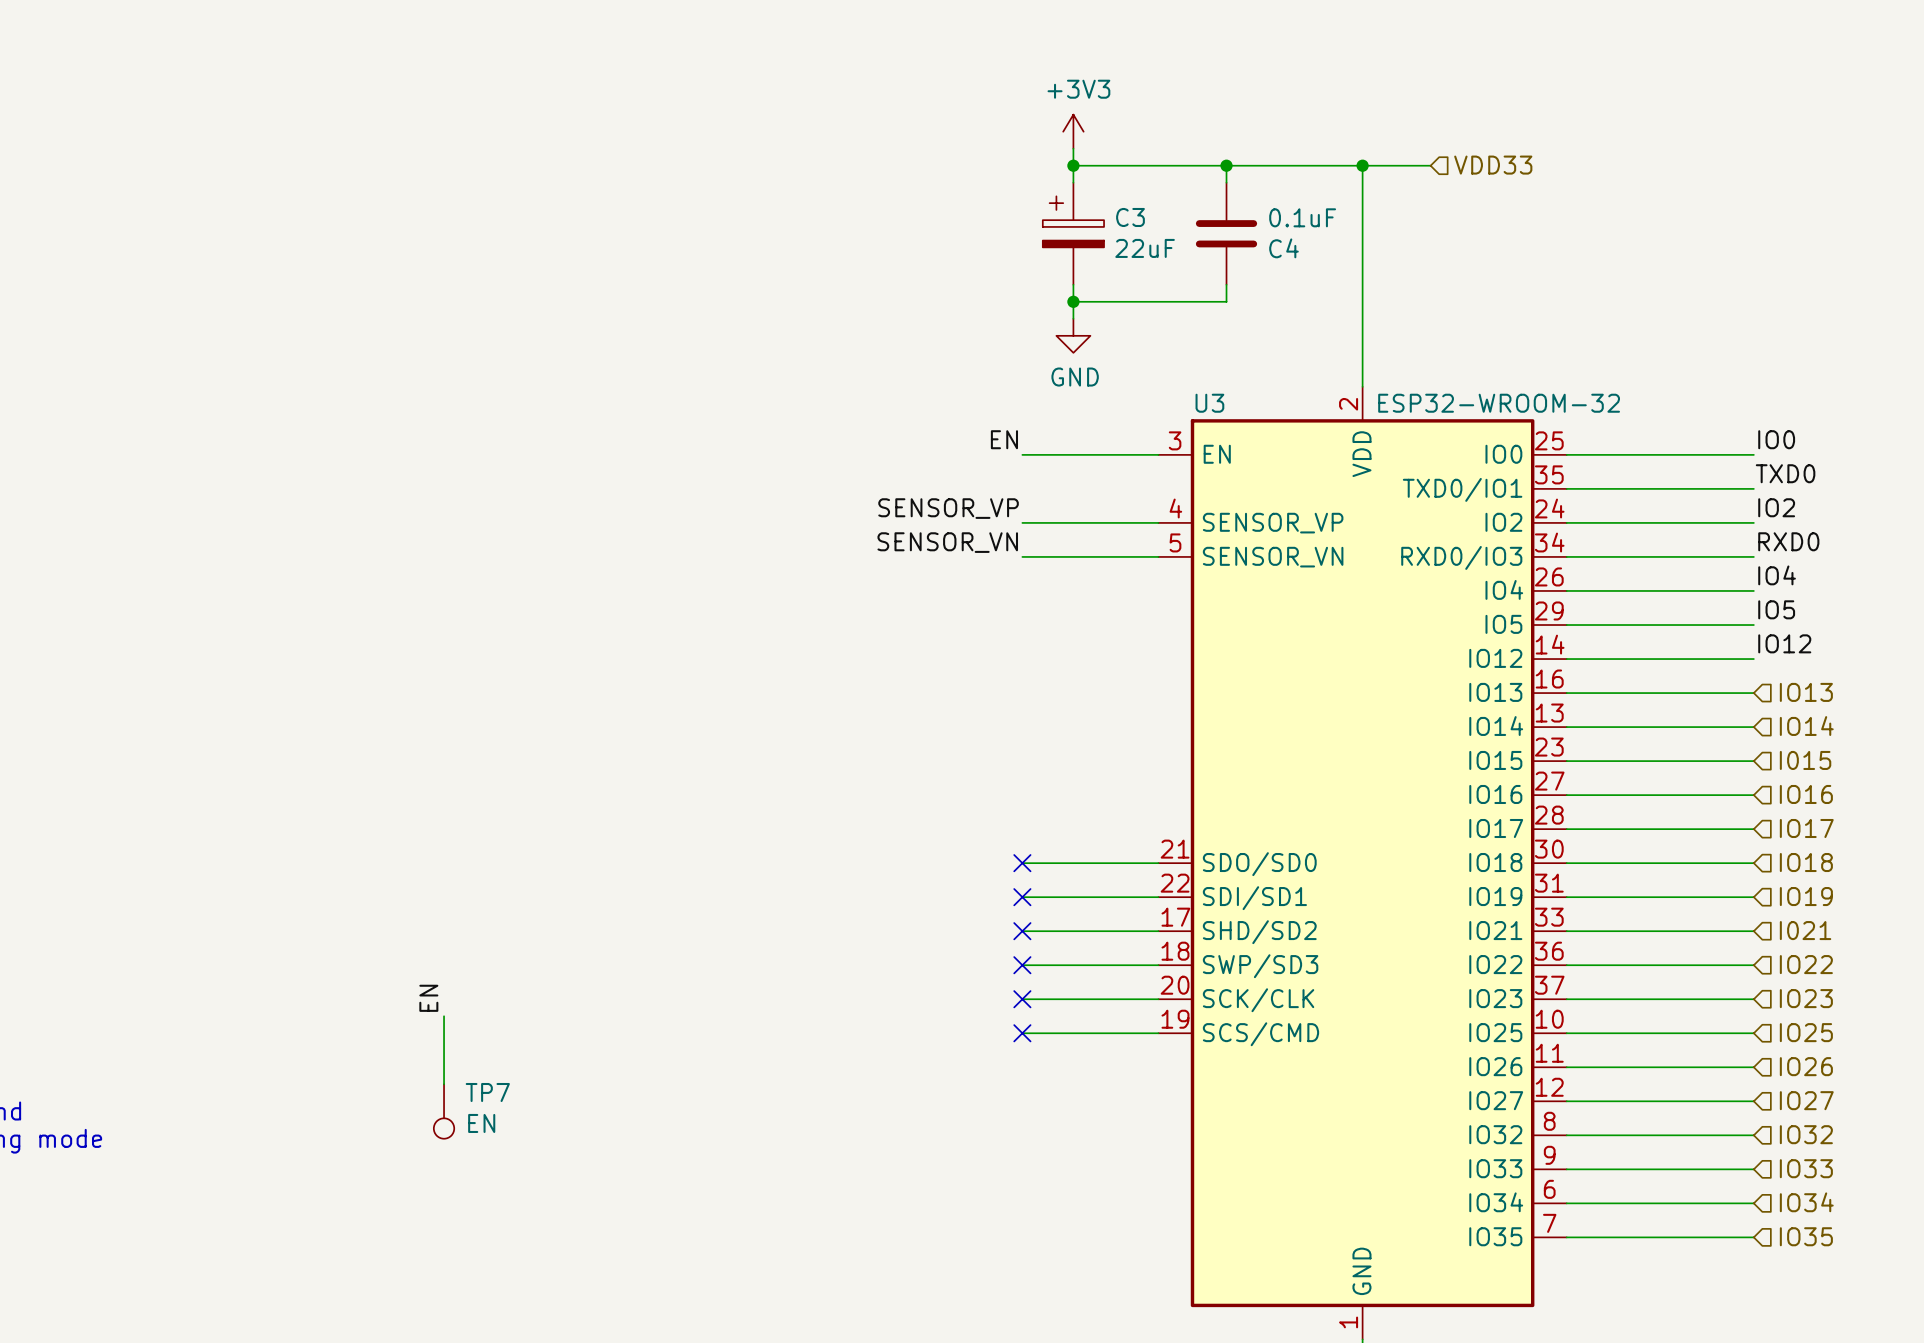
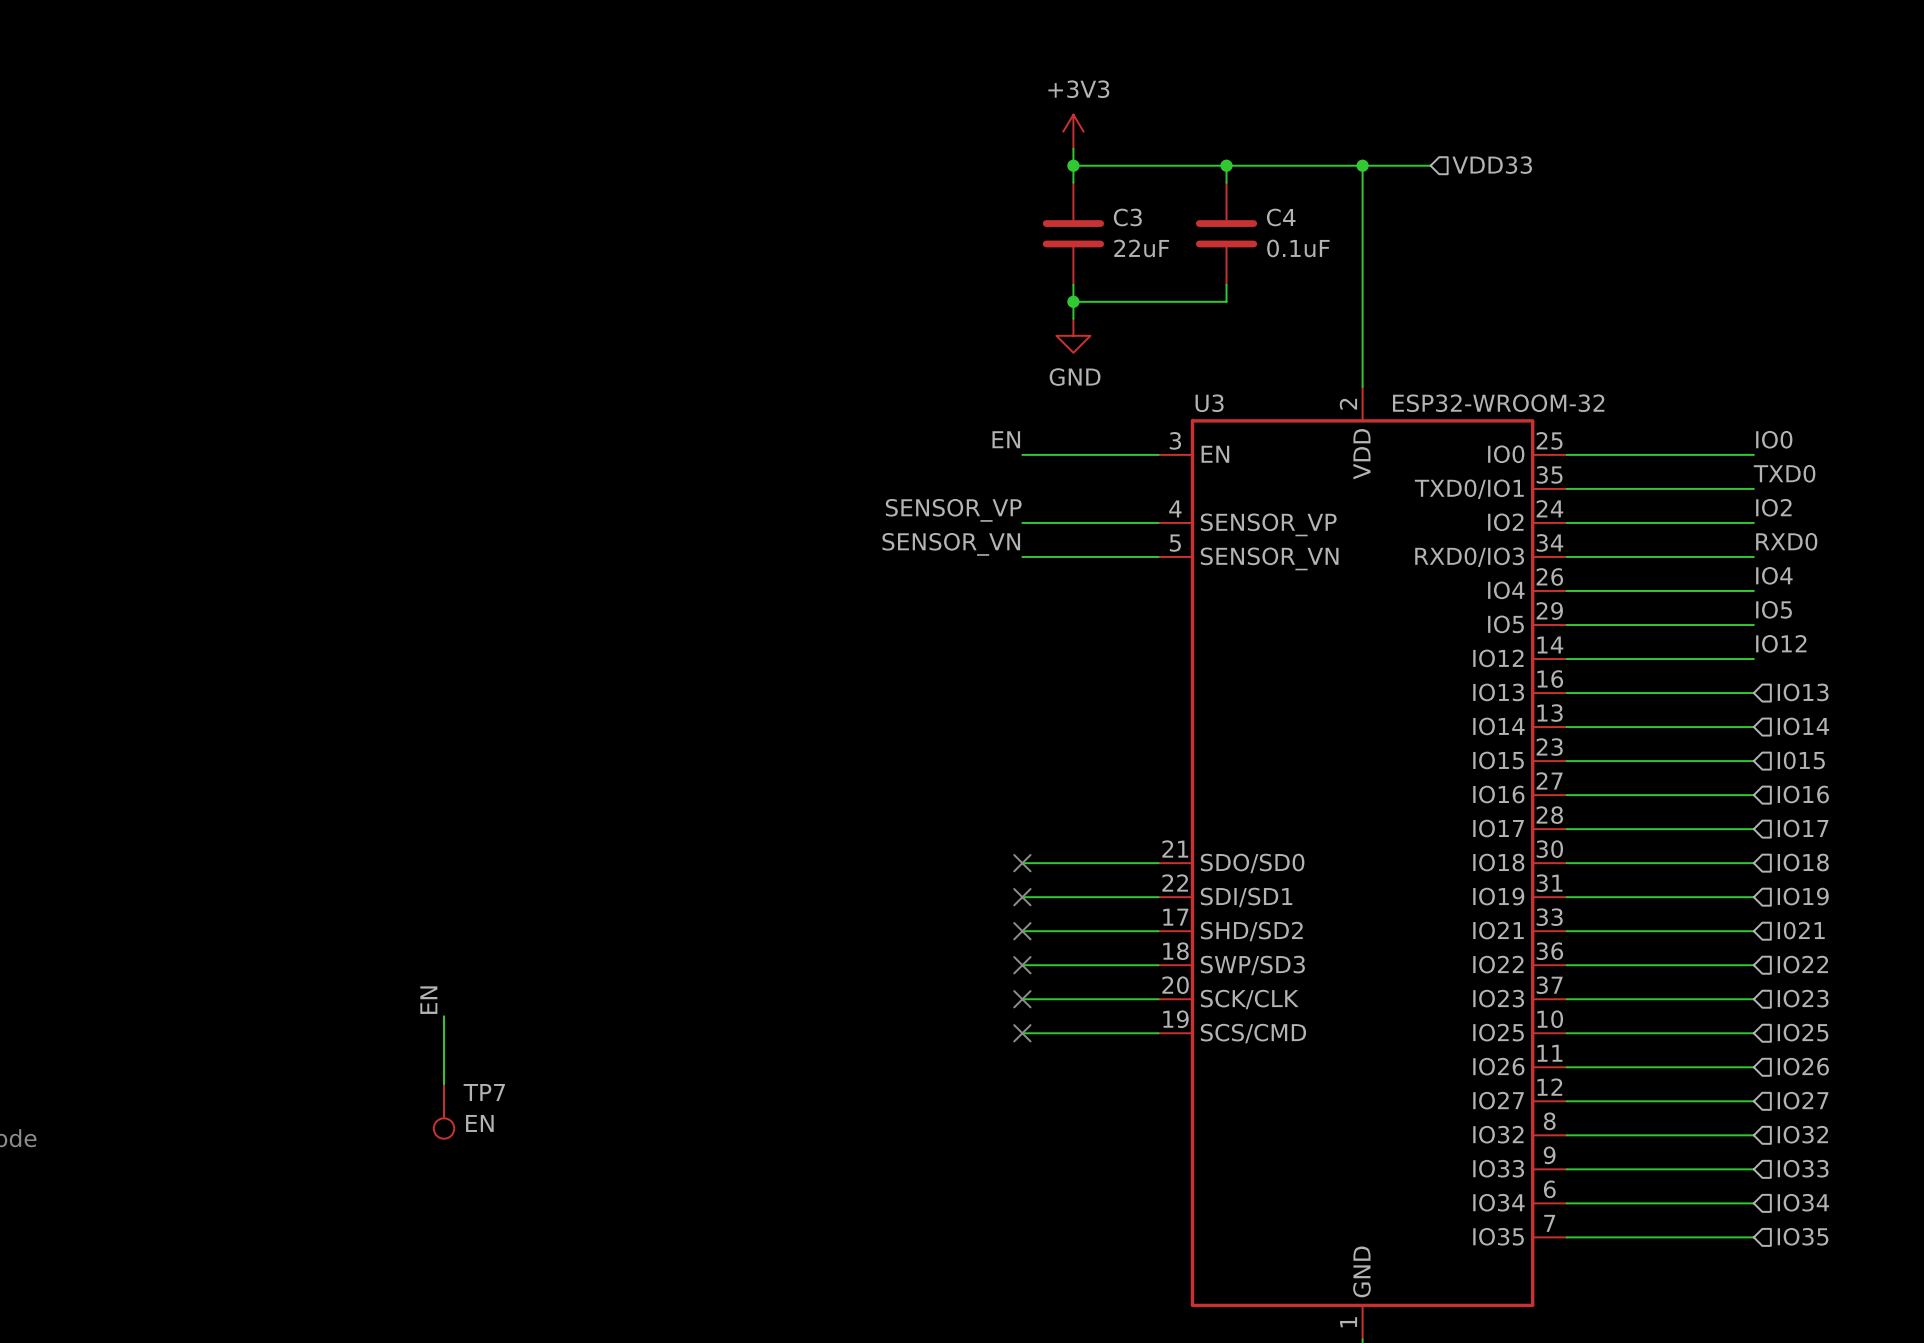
C3 symbol: [1042, 182, 1105, 285] -> [1042, 182, 1105, 285]
C4 value position: 0.1uF (1302, 217) -> 0.1uF (1298, 248)
C4 name position: C4 (1283, 248) -> C4 (1281, 217)

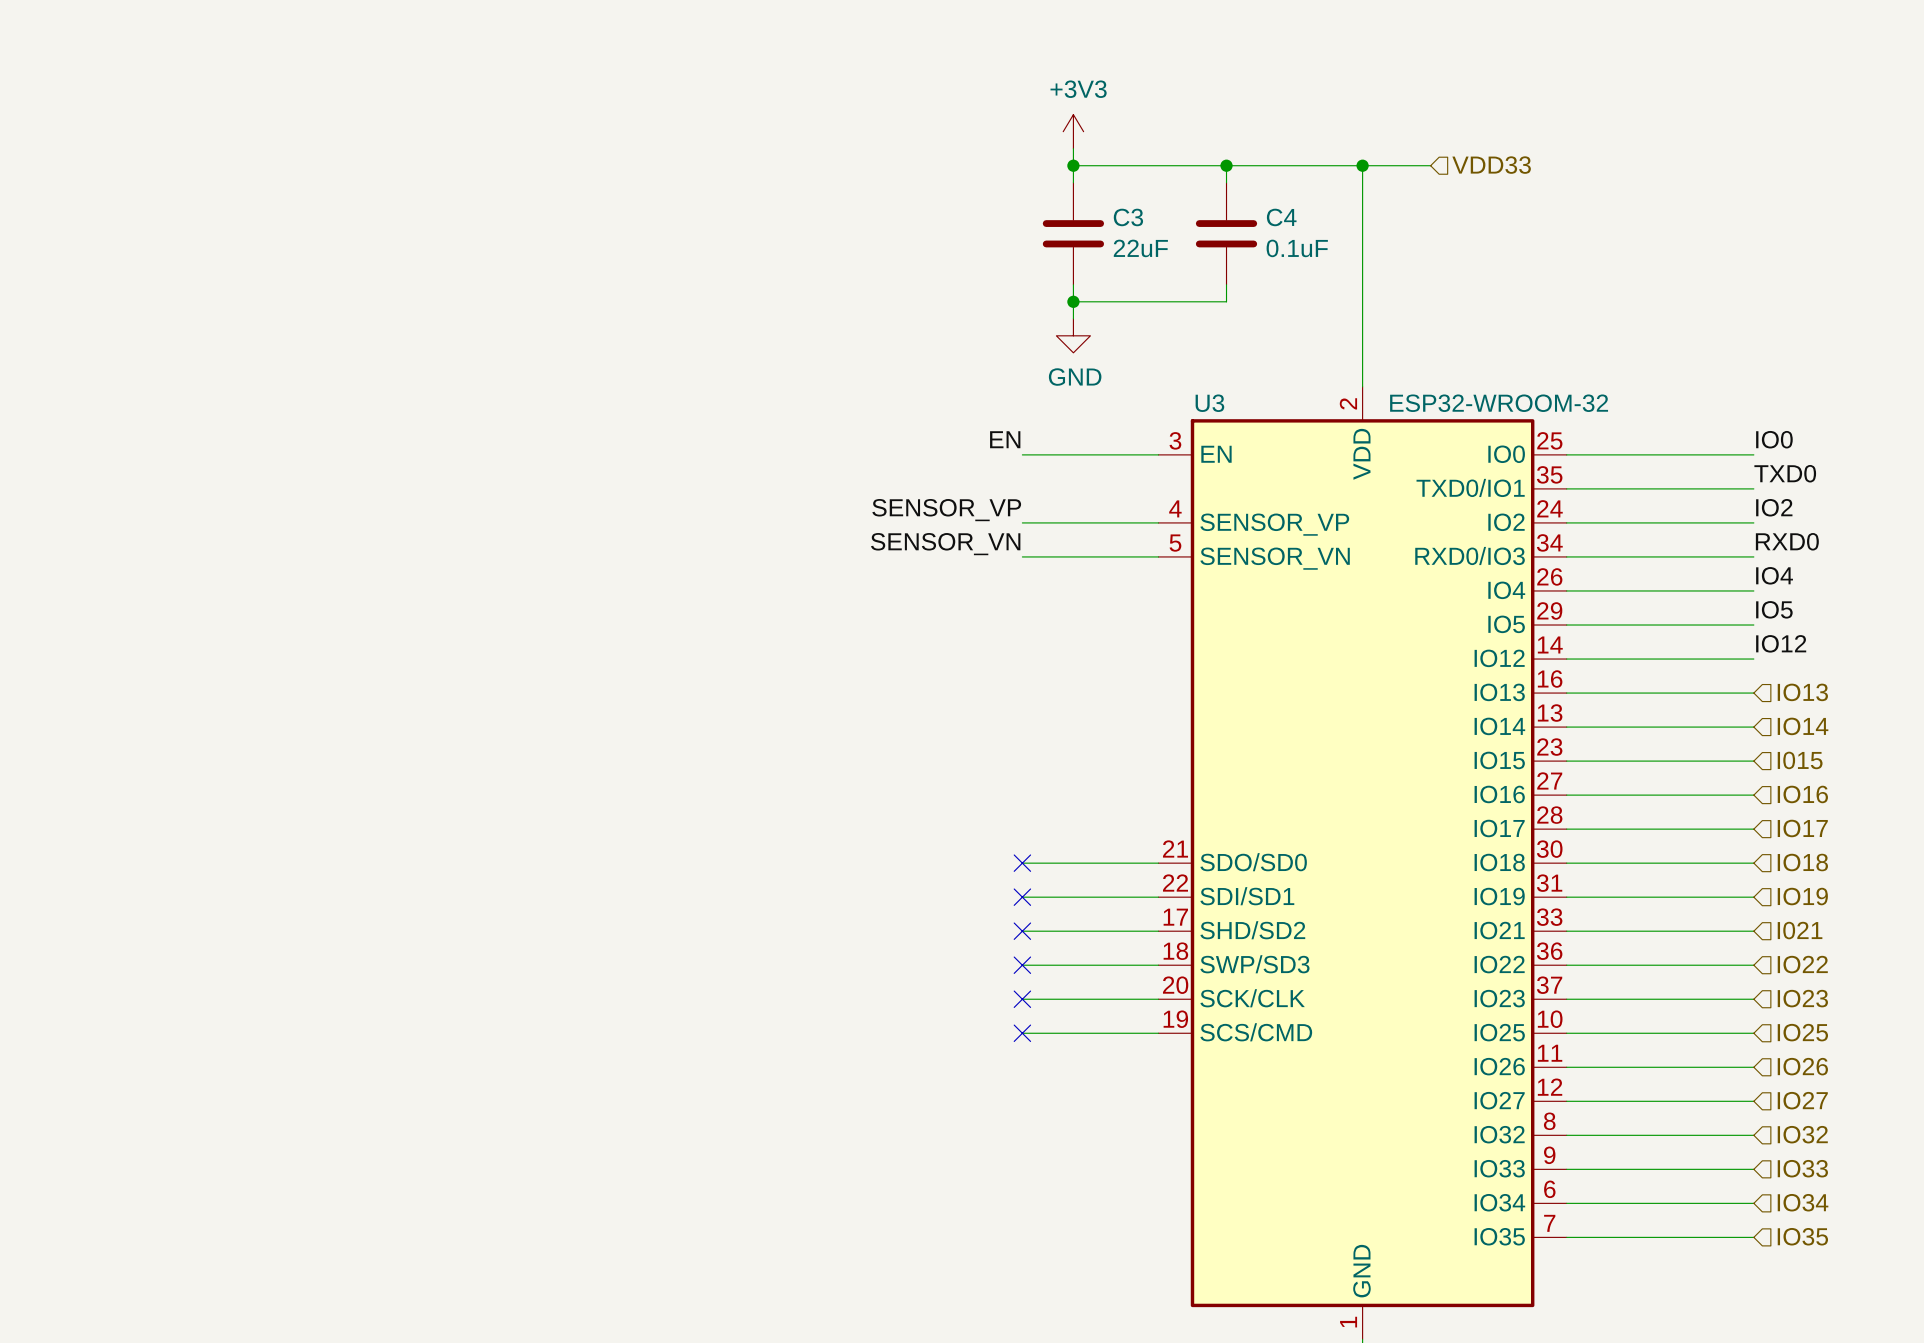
label: EN (428, 1000) -> none
wire: (444, 1016) (444, 1084) -> none
TP7: EN (444, 1111) -> none

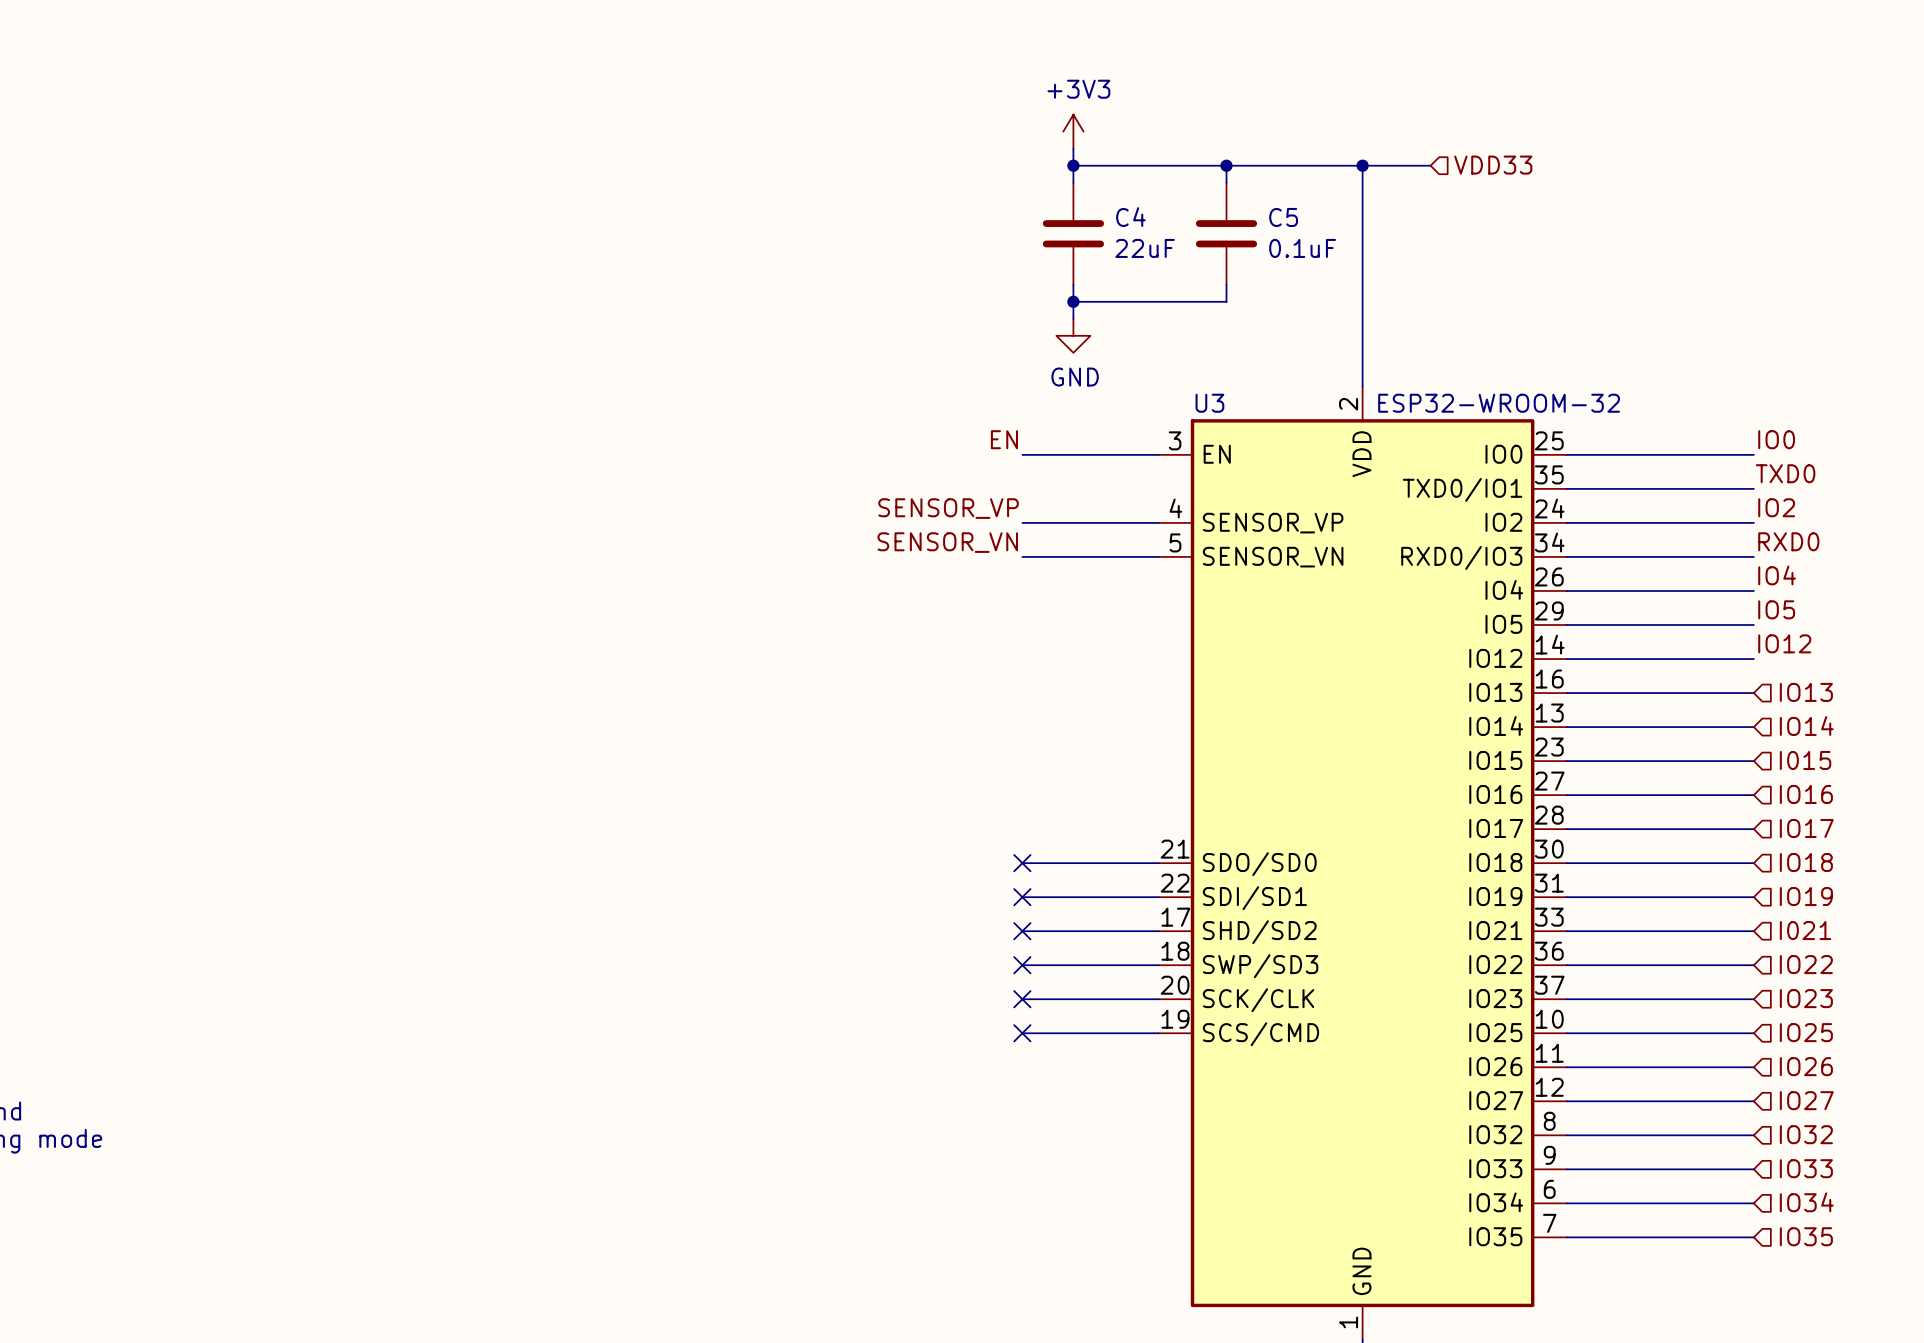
C3 name: C3 (1128, 217) -> C4 (1130, 217)
C4 name: C4 (1281, 217) -> C5 (1283, 217)

